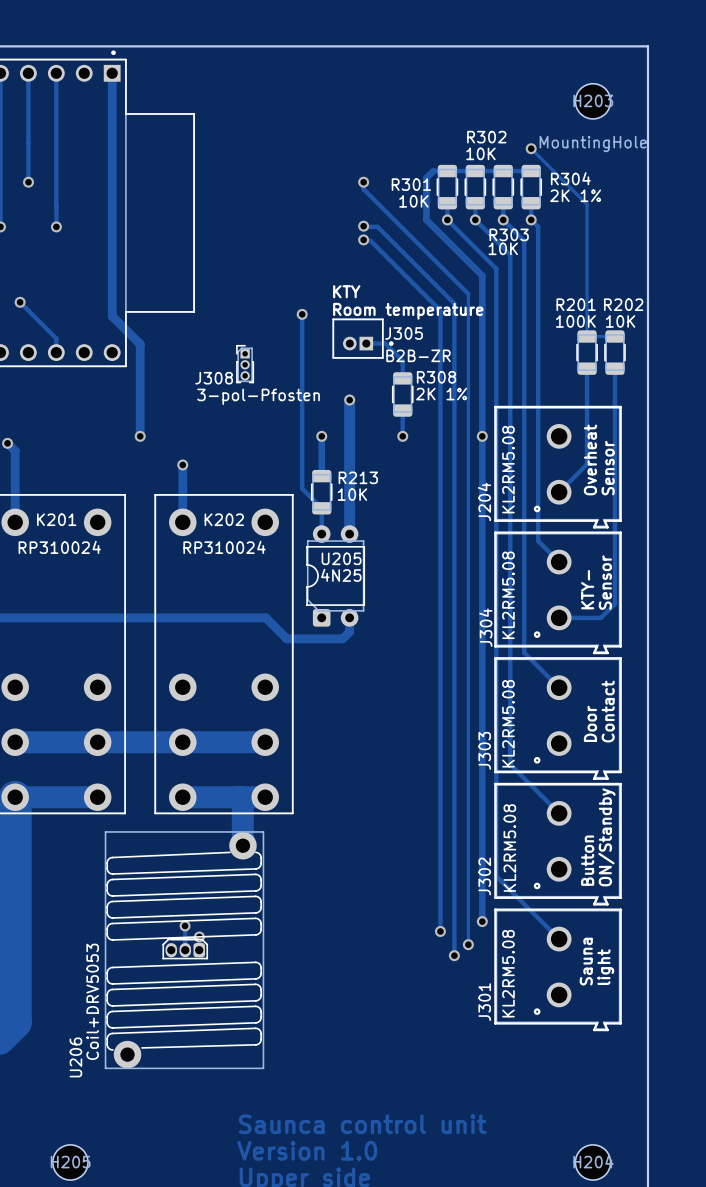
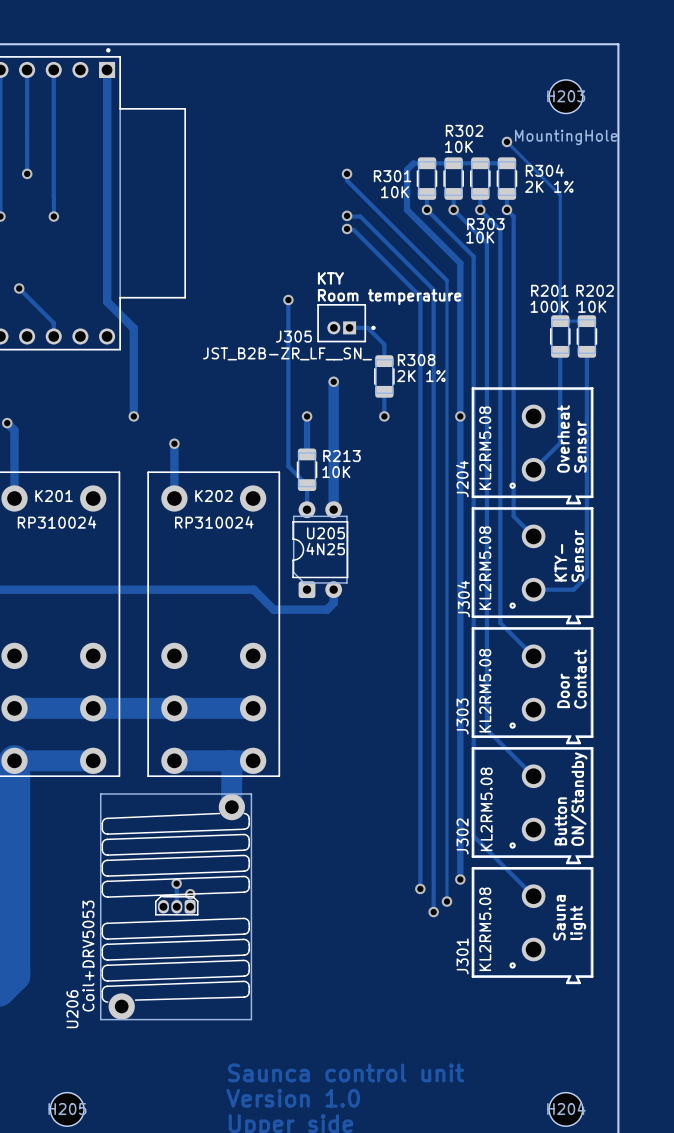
J305 name position: J305 (404, 333) -> J305 (293, 336)
J305 value: B2B-ZR (418, 355) -> JST_B2B-ZR_LF__SN_ (287, 353)
J308: 3-pol-Pfosten (245, 364) -> none

